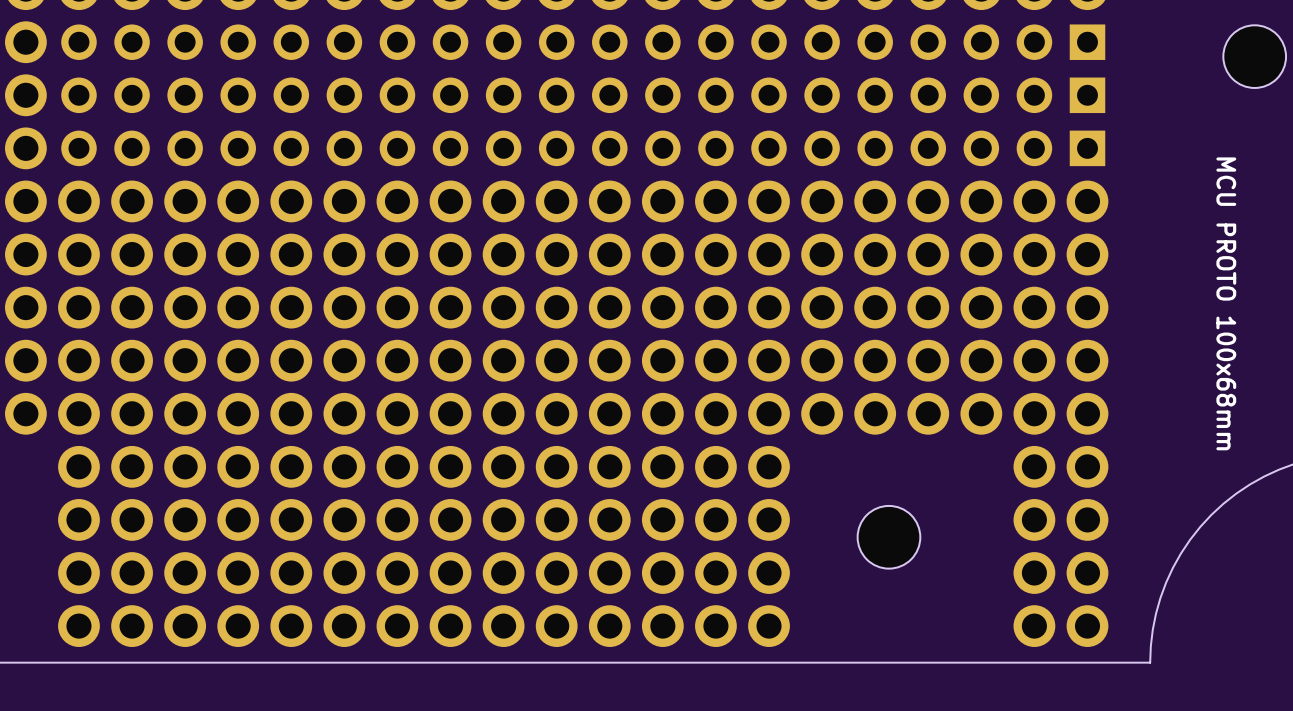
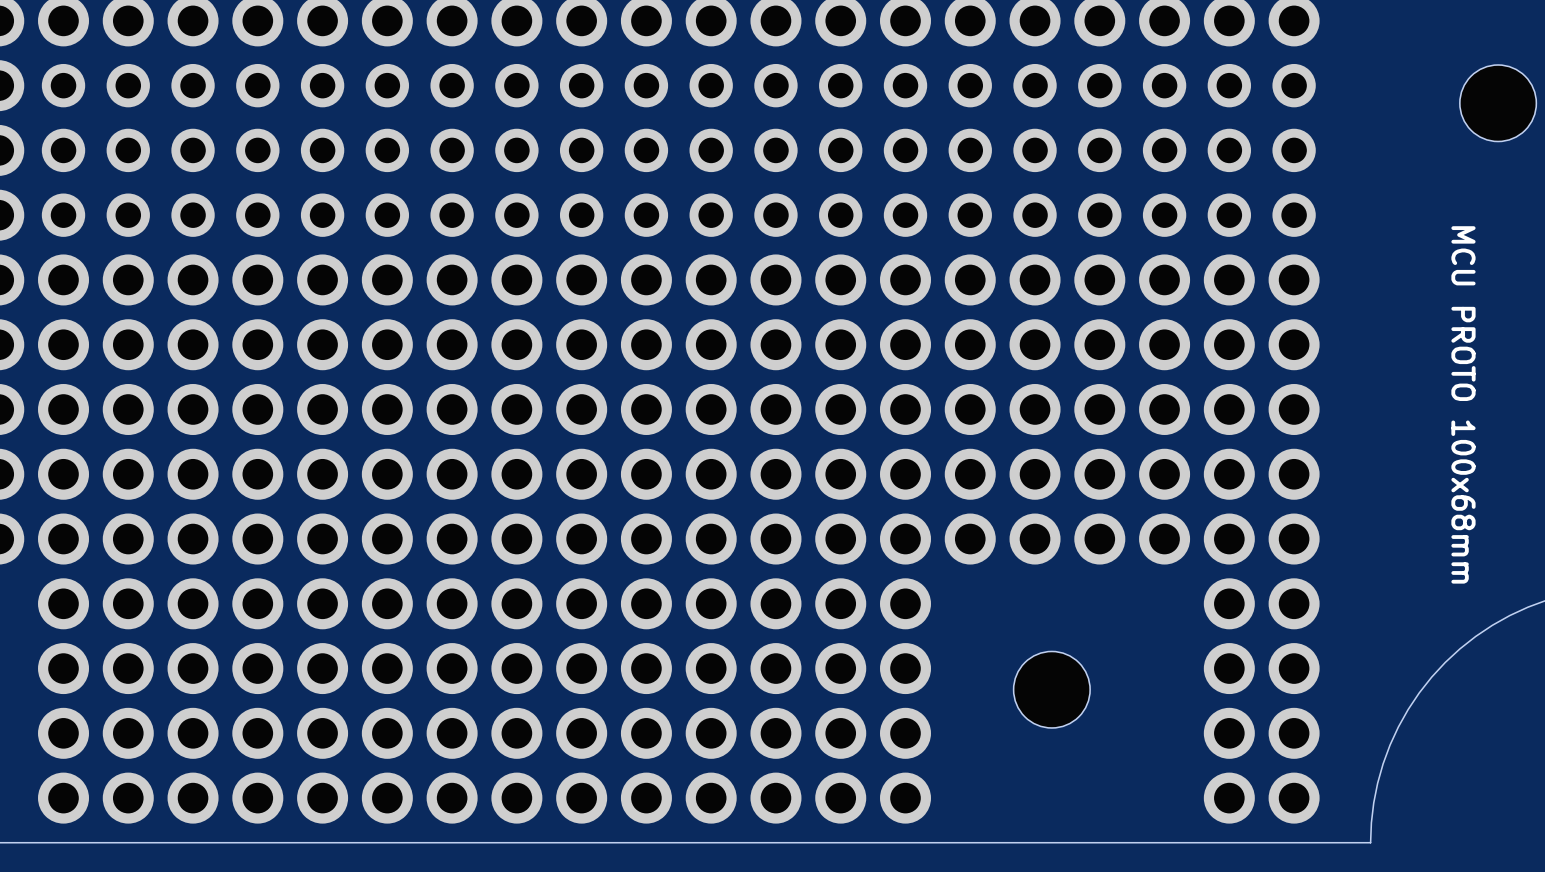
part: (583, 42) -> none
part: none -> (1294, 85)
part: (583, 95) -> none
part: none -> (1294, 150)
part: (583, 148) -> none
part: none -> (1294, 215)

